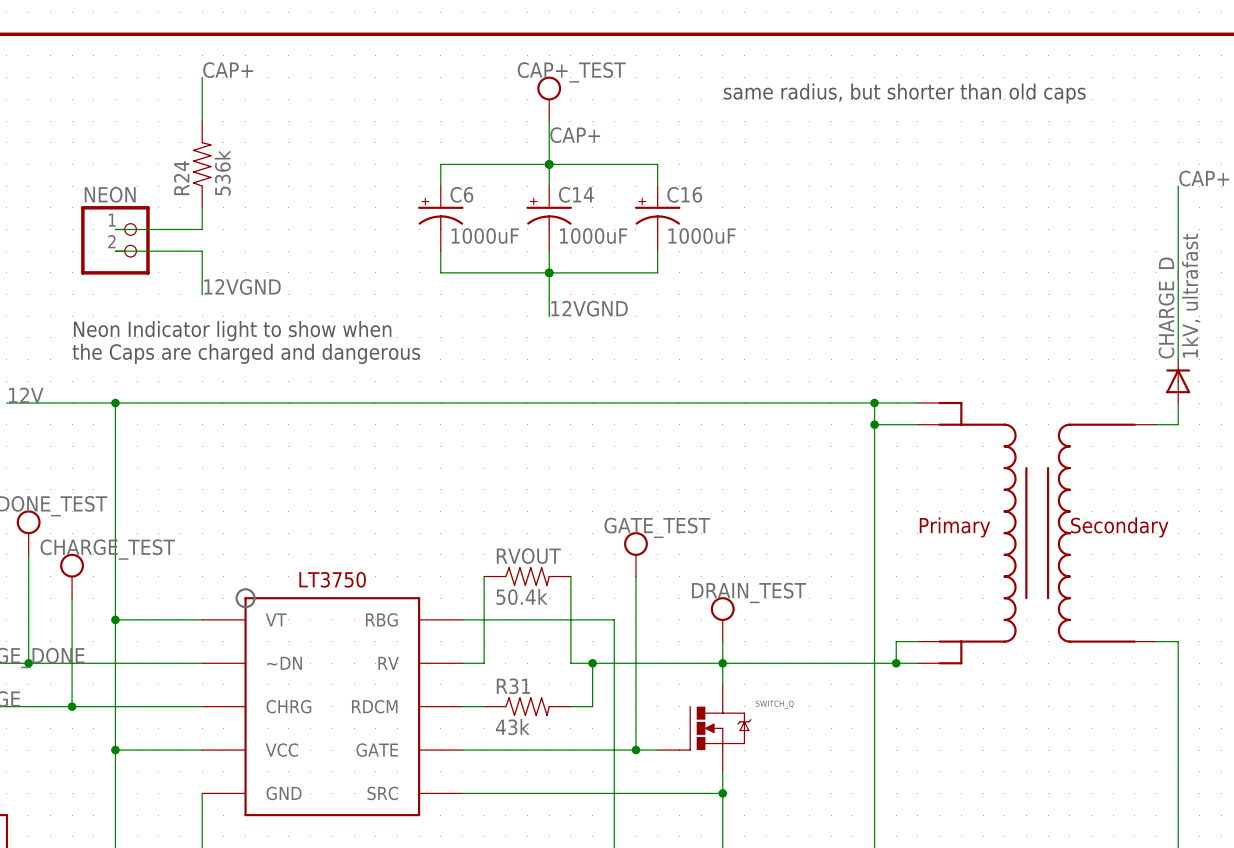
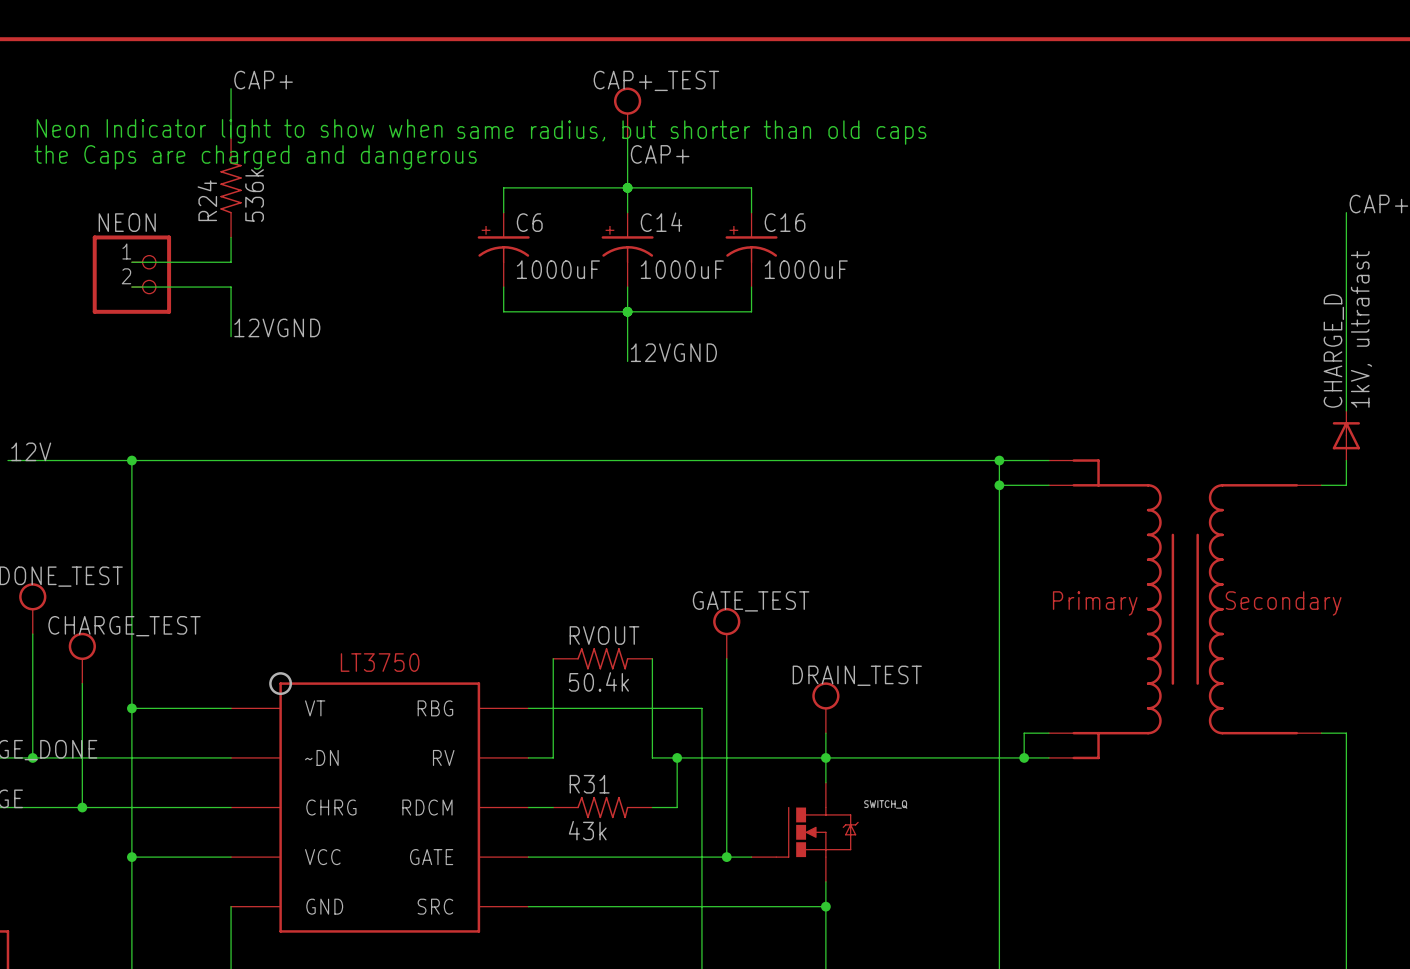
text: same radius, but shorter than old caps (904, 93) -> none
text: none -> Neon Indicator light to show when (239, 131)
text: none -> same radius, but shorter than old caps (691, 132)
text: none -> the Caps are charged and dangerous (255, 157)
text: Neon Indicator light to show when (232, 331) -> none
text: the Caps are charged and dangerous (246, 353) -> none

